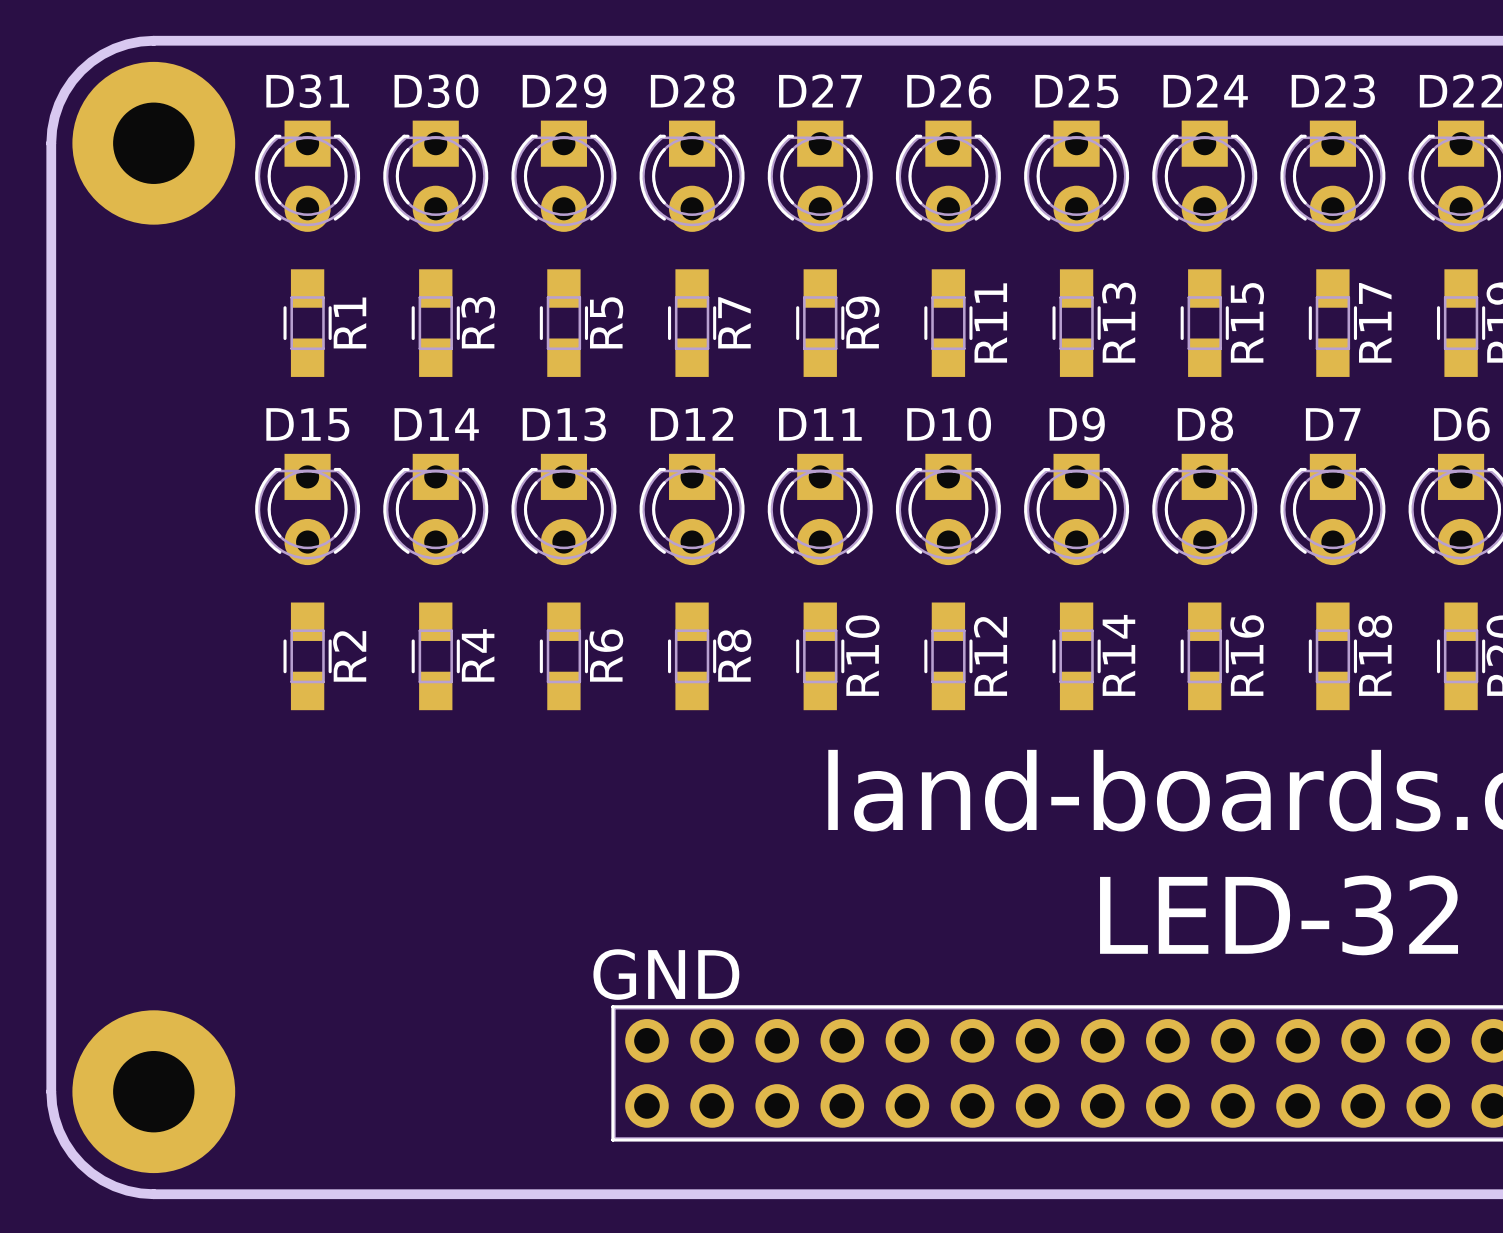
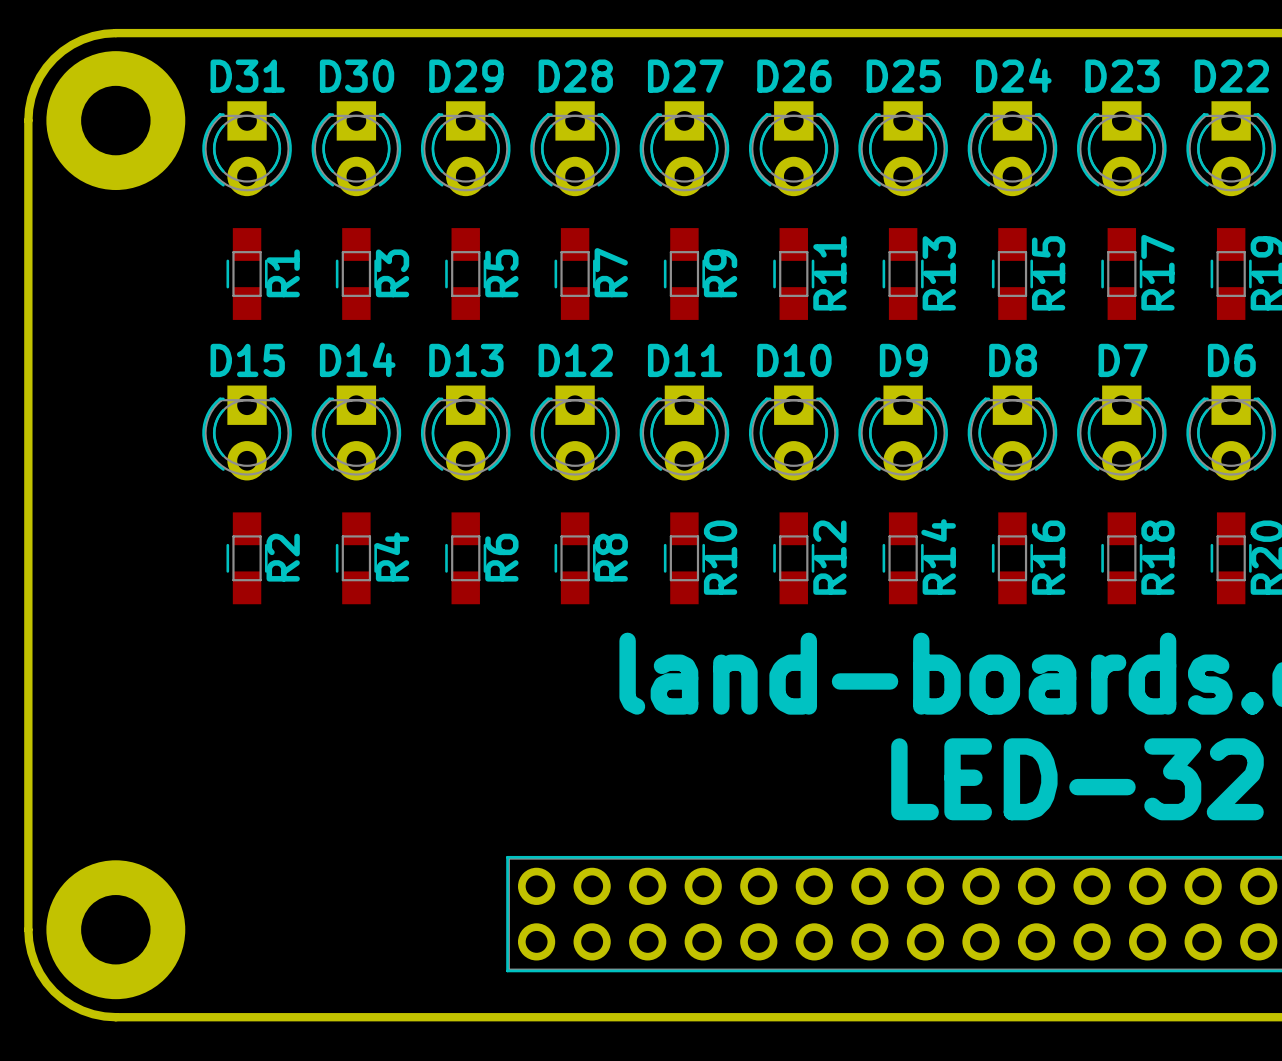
text: GND (666, 974) -> none

